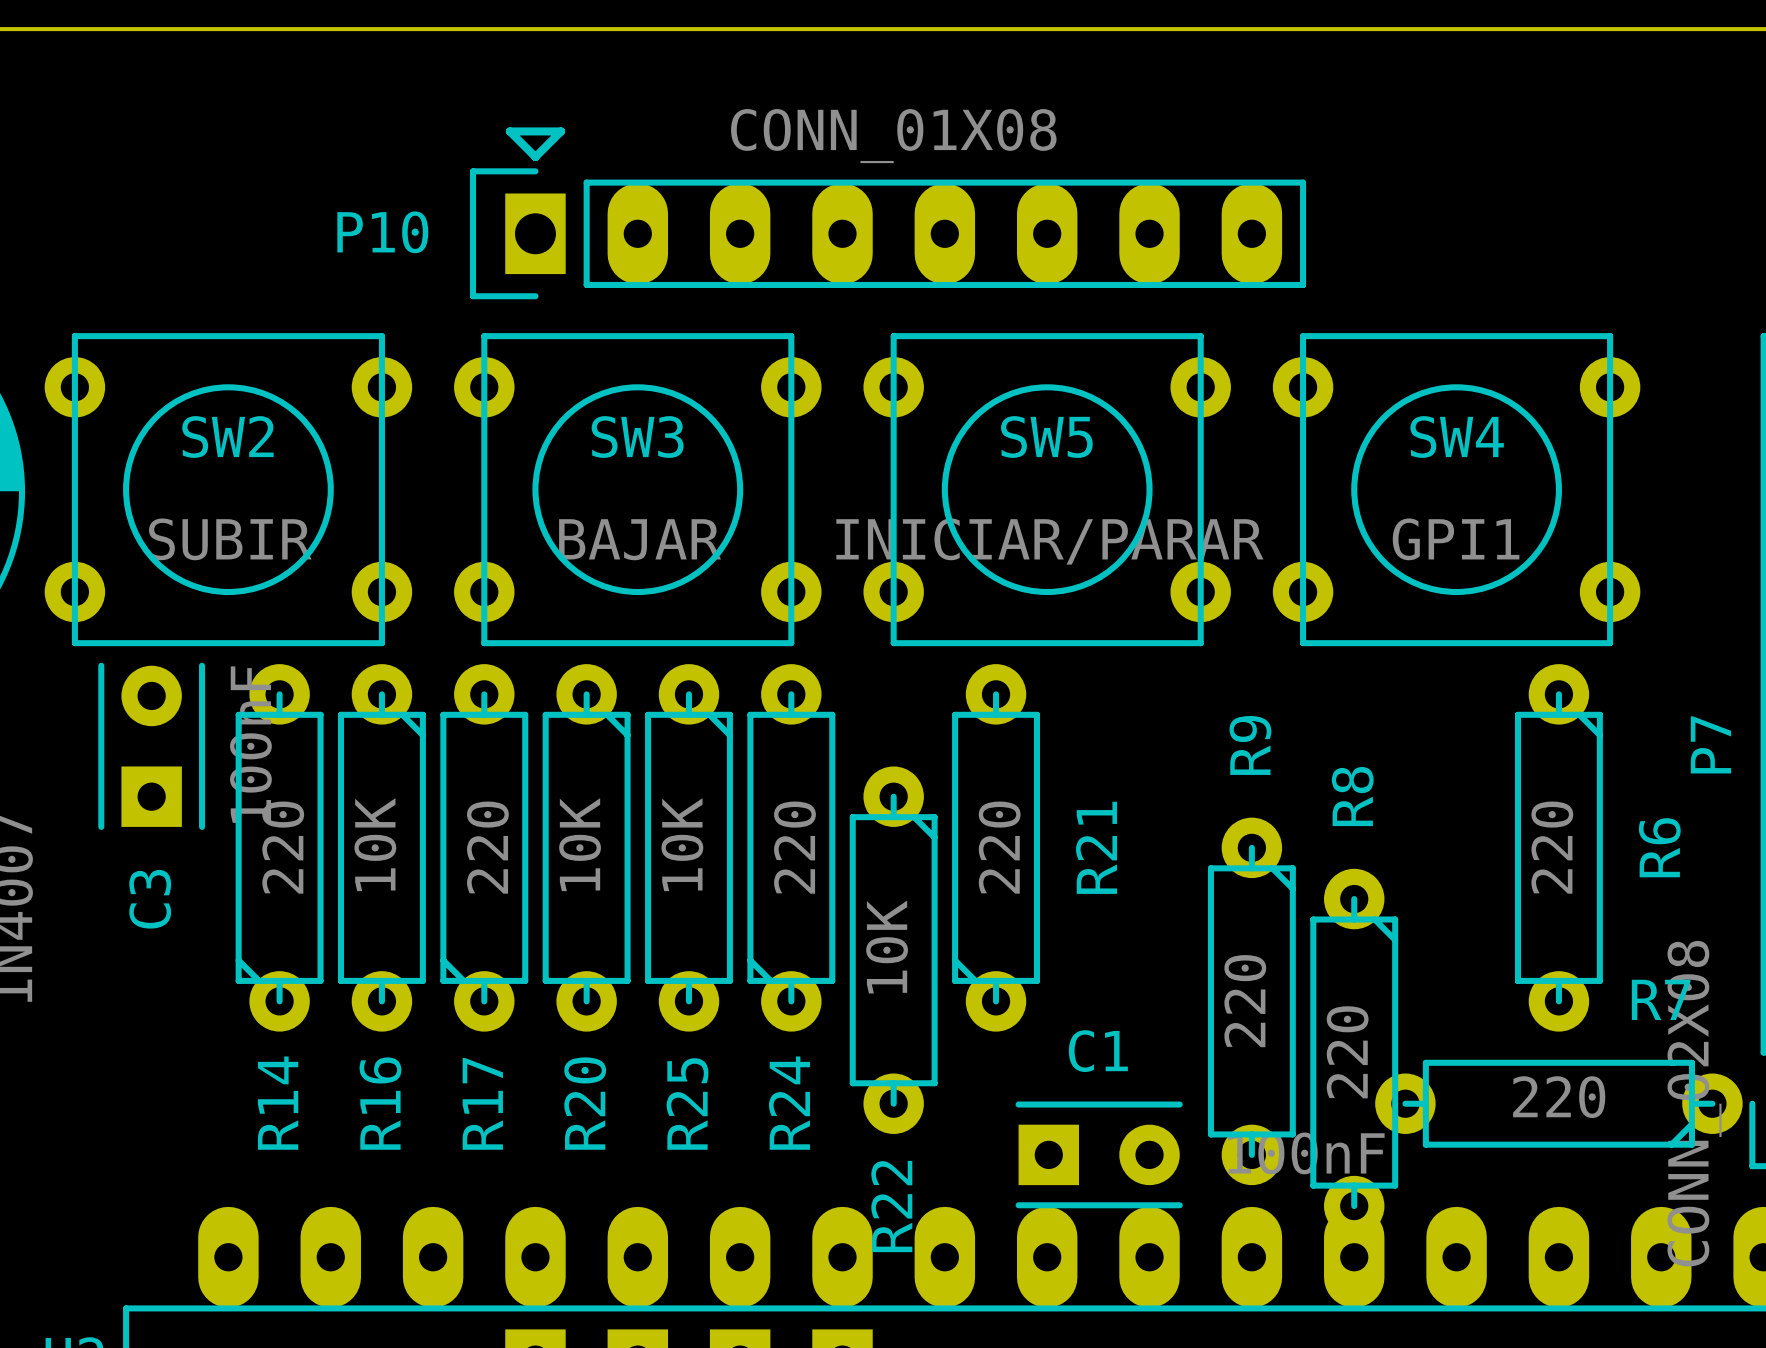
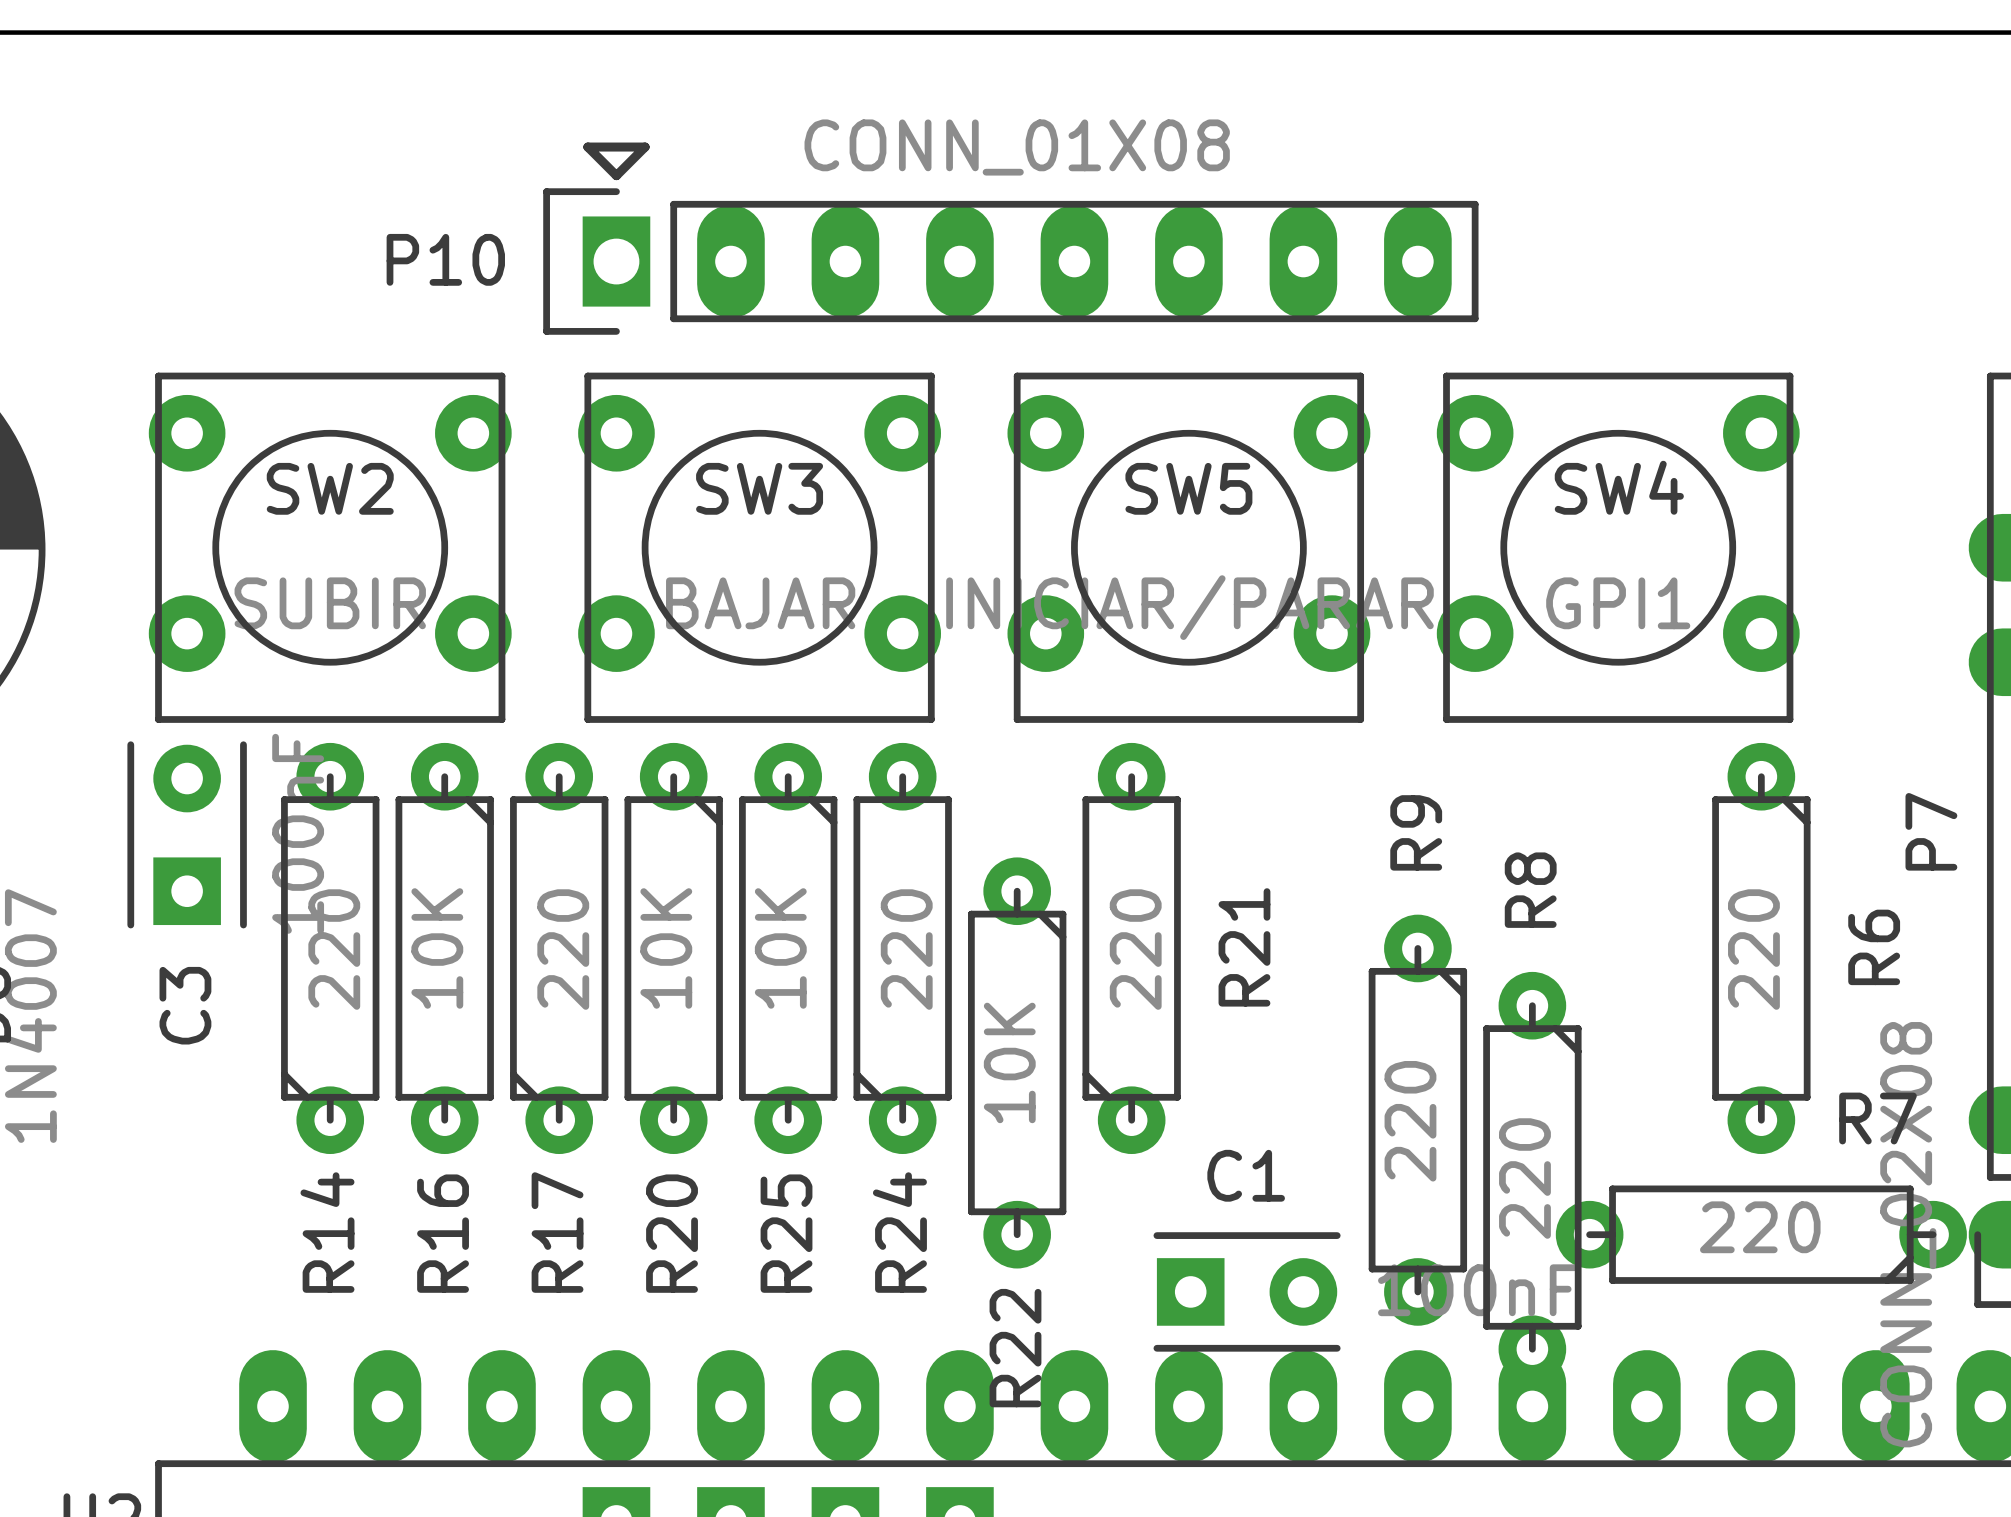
SW2 footprint: [44, 333, 413, 647] -> [148, 372, 512, 723]
SW3 footprint: [454, 333, 822, 647] -> [578, 372, 942, 723]
SW5 footprint: [863, 333, 1231, 647] -> [1007, 372, 1371, 723]
SW4 footprint: [1272, 333, 1641, 647] -> [1436, 372, 1800, 723]

